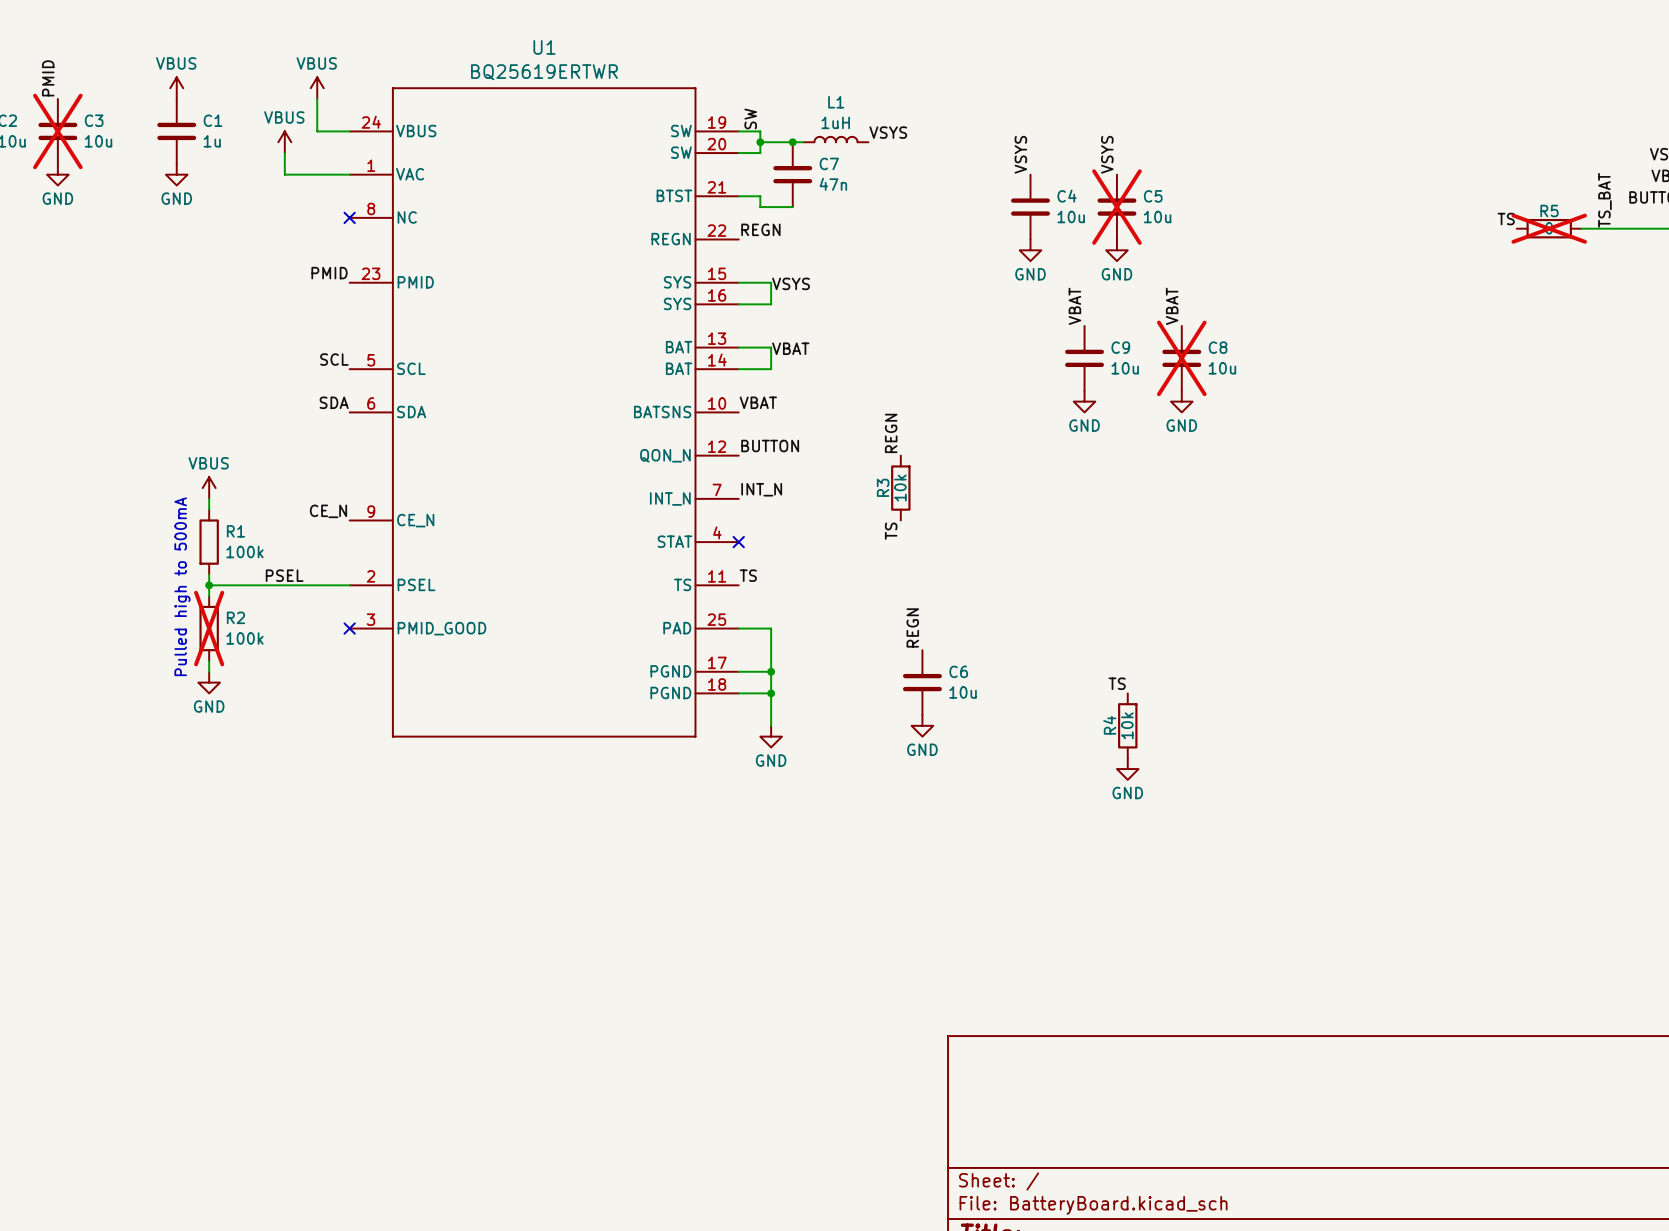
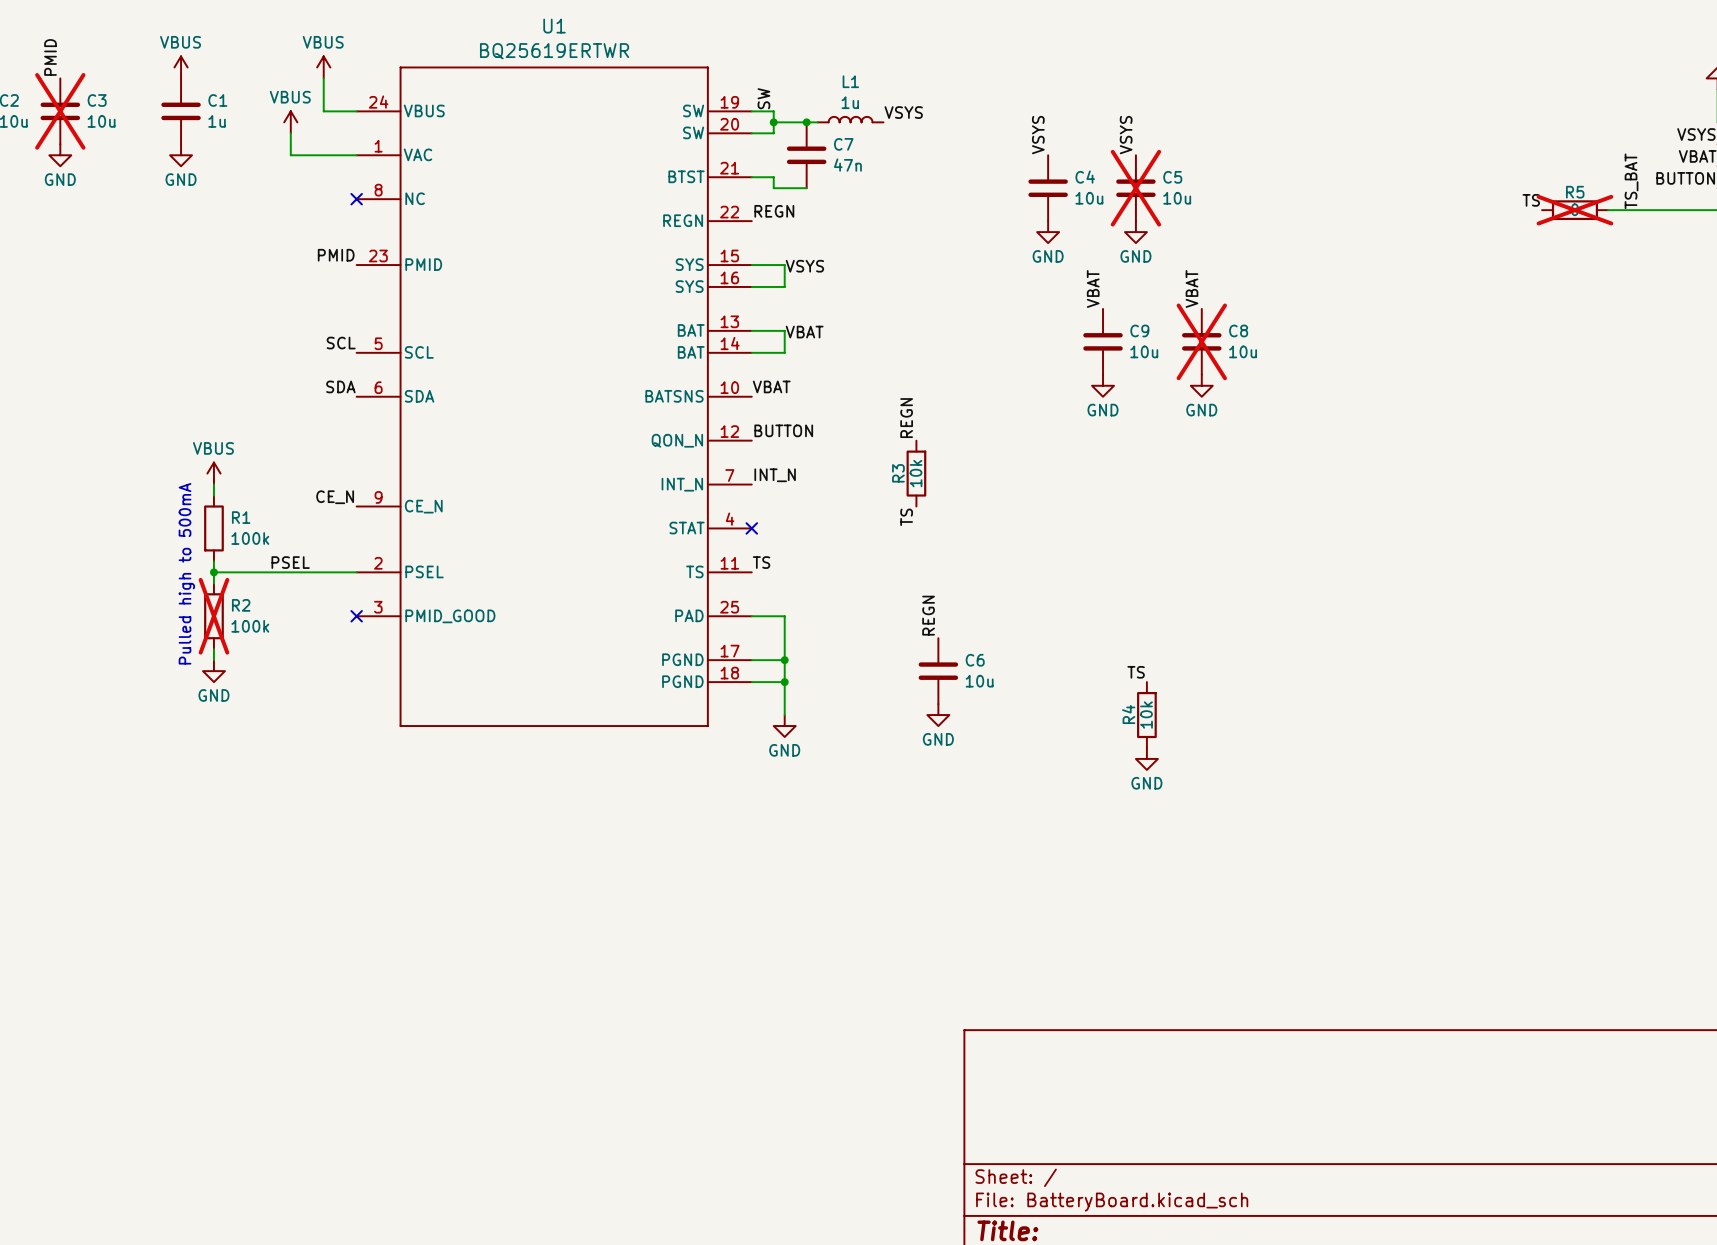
L1 value: 1uH (835, 122) -> 1u (850, 102)

